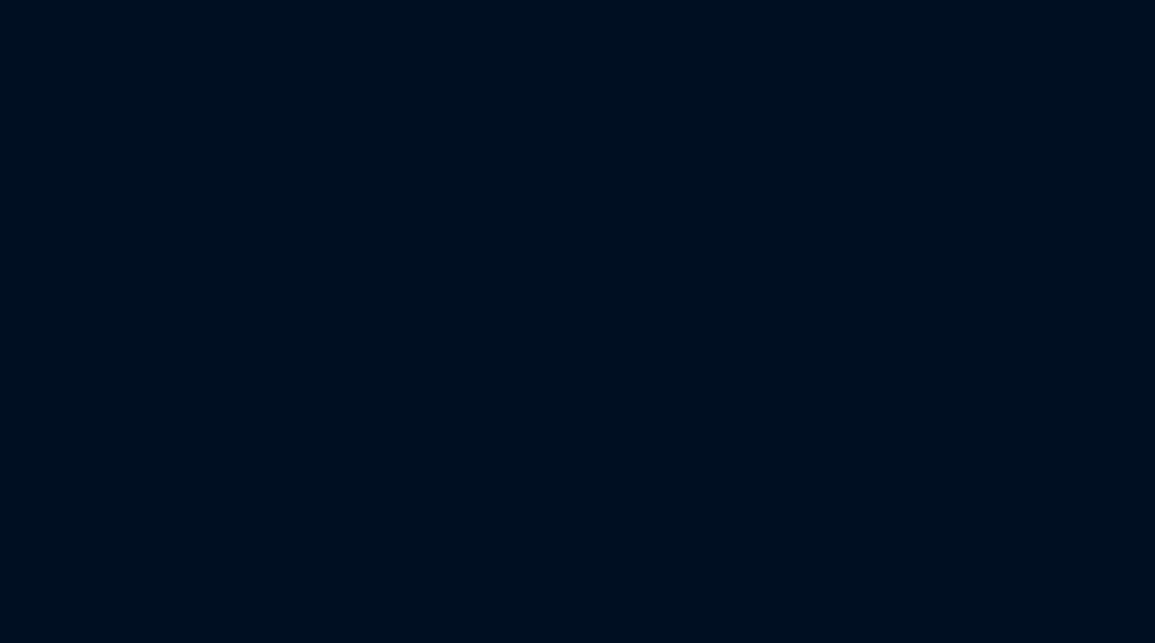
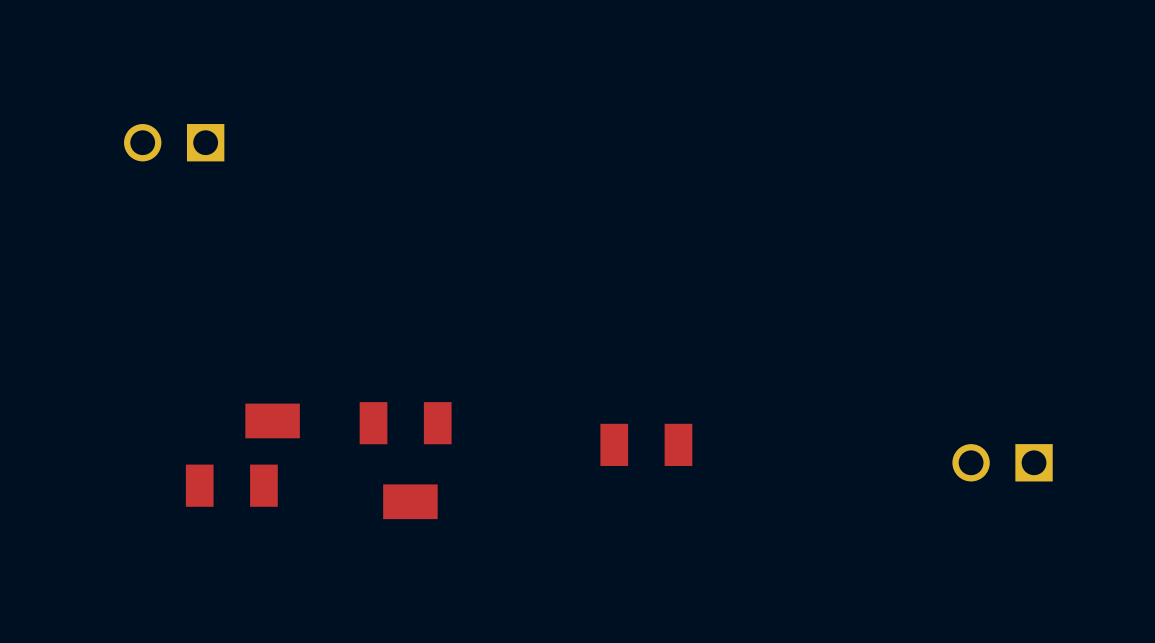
part: none -> (174, 142)
part: none -> (272, 420)
part: none -> (405, 423)
part: none -> (646, 444)
part: none -> (1002, 462)
part: none -> (231, 485)
part: none -> (410, 501)

